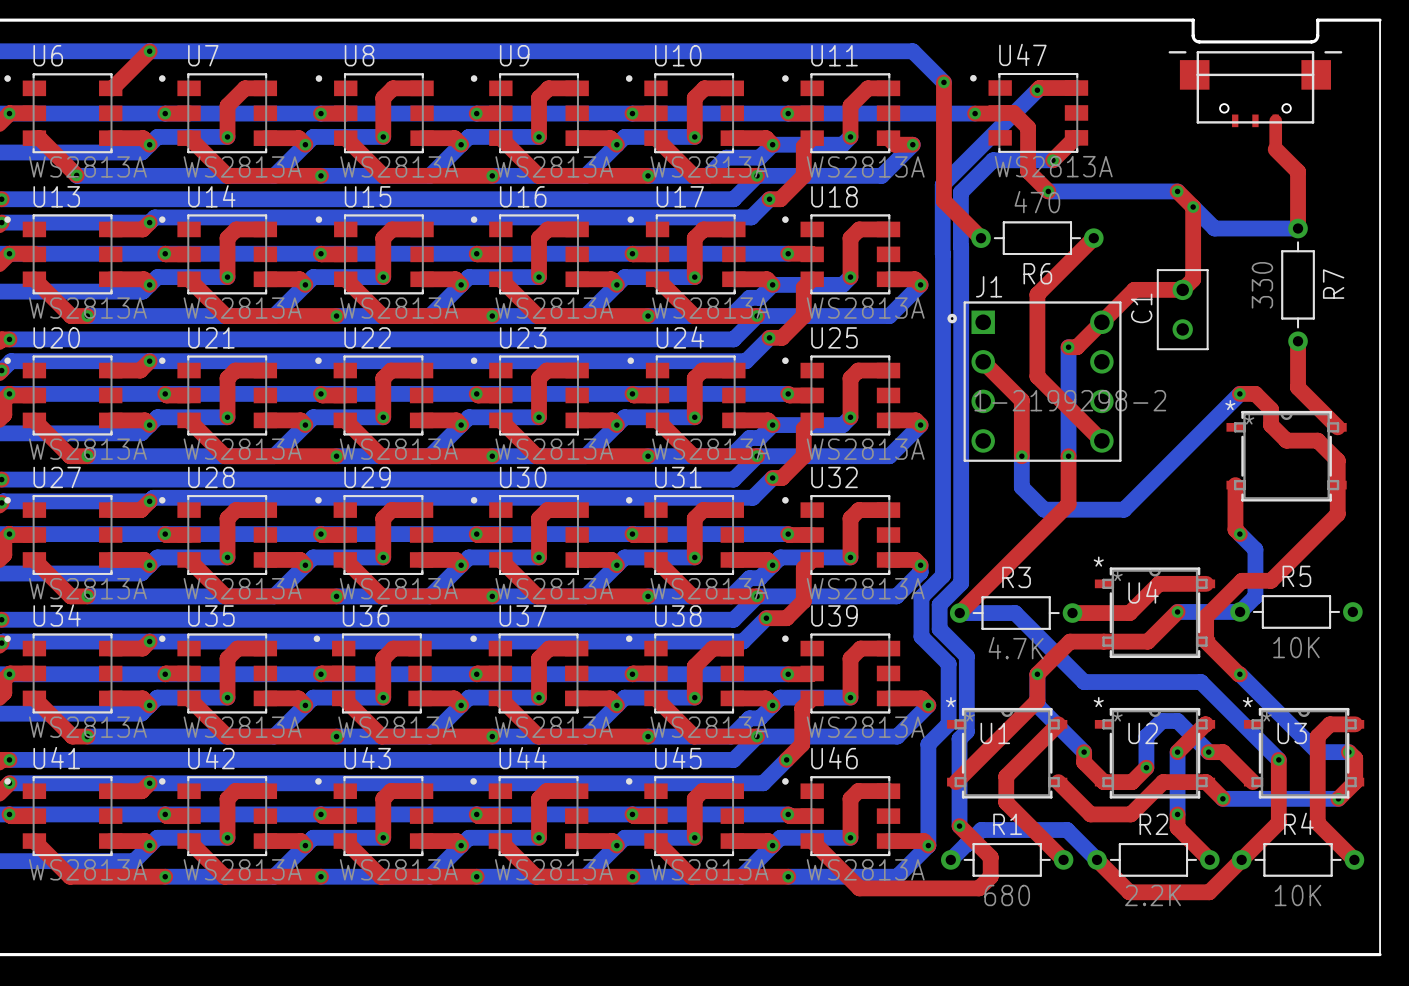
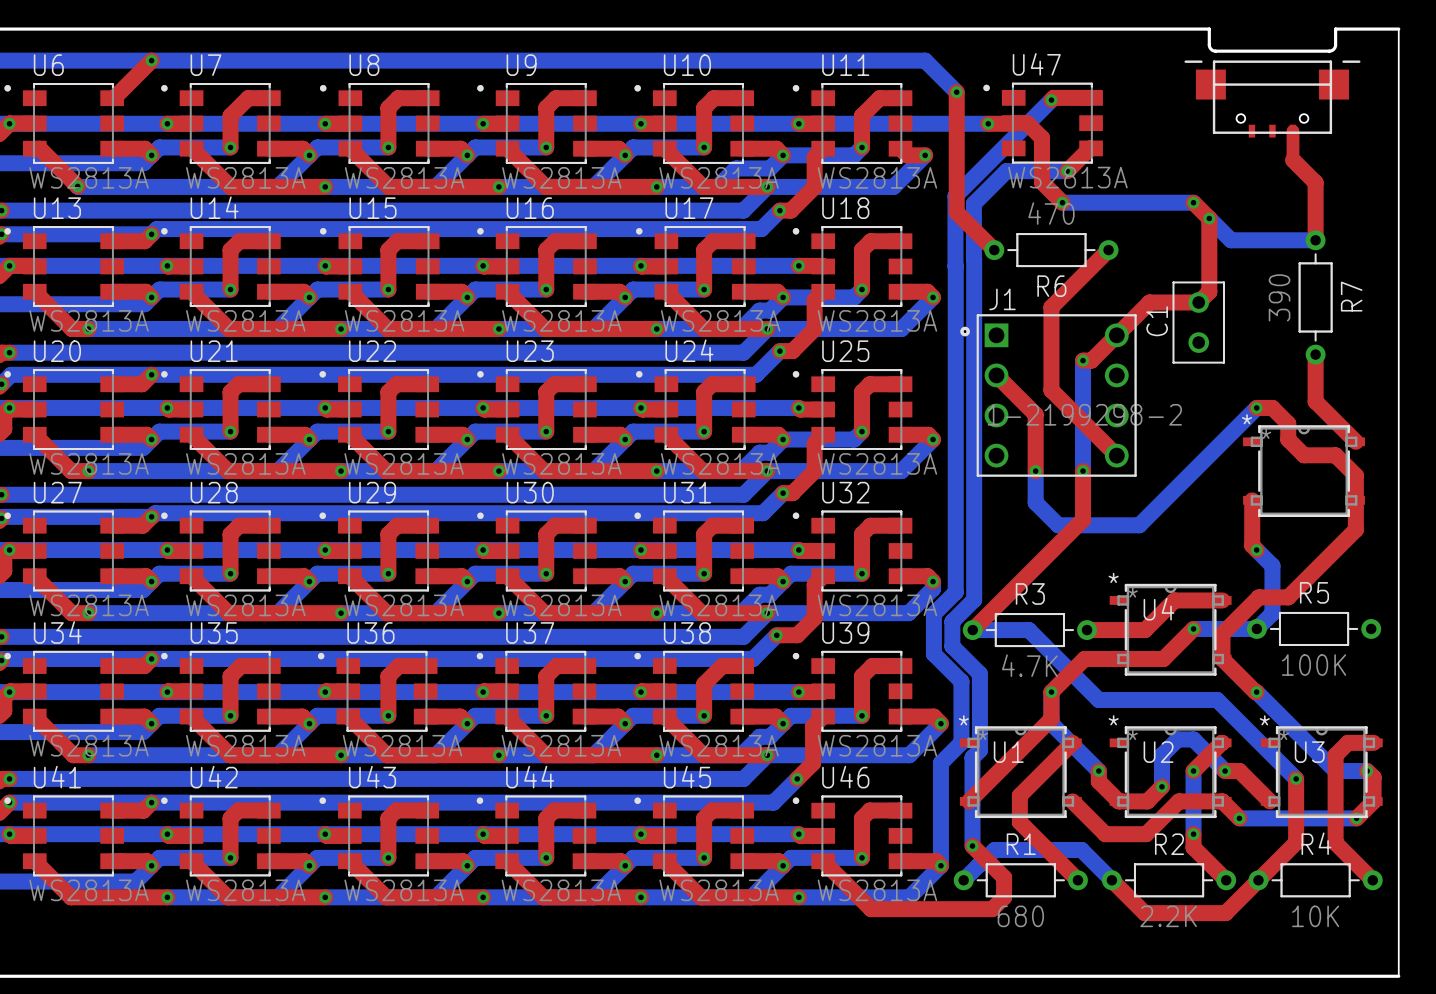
R7 value: 330 (1262, 285) -> 390 (1279, 297)
R5 value: 10K (1296, 647) -> 100K (1314, 665)

